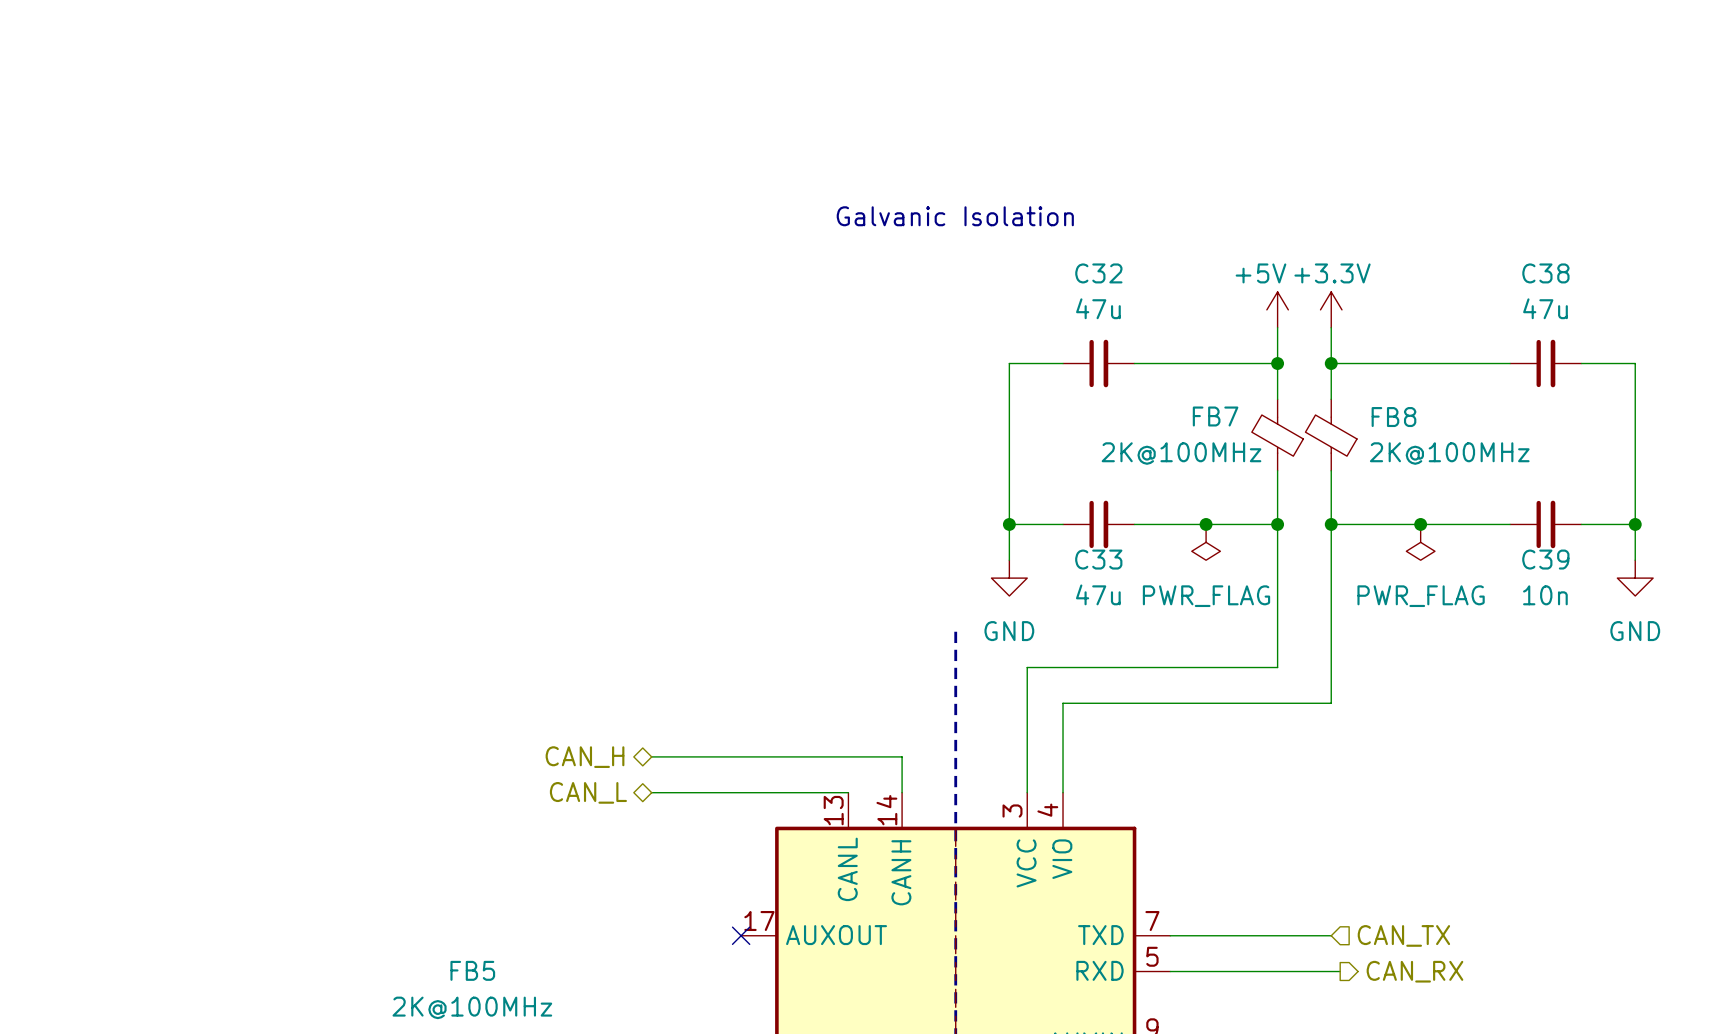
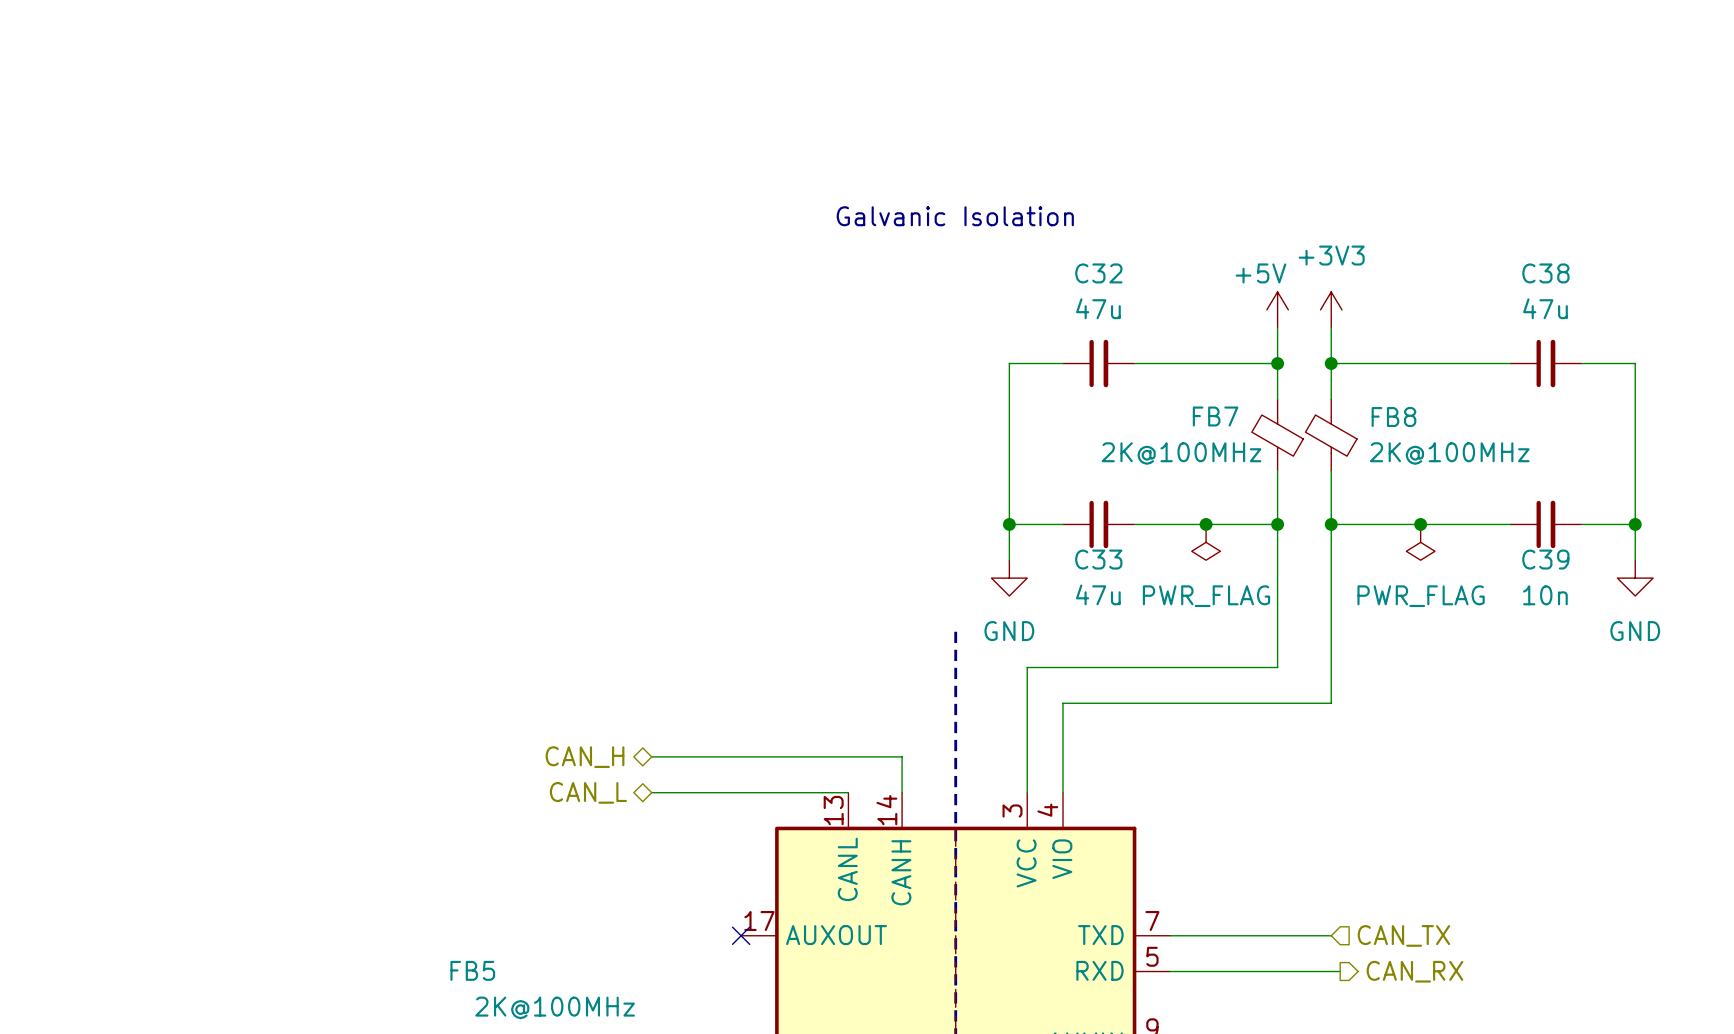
power symbol: +3.3V (1331, 309) -> +3V3 (1331, 309)
FB5 value position: 2K@100MHz (472, 1007) -> 2K@100MHz (555, 1007)

